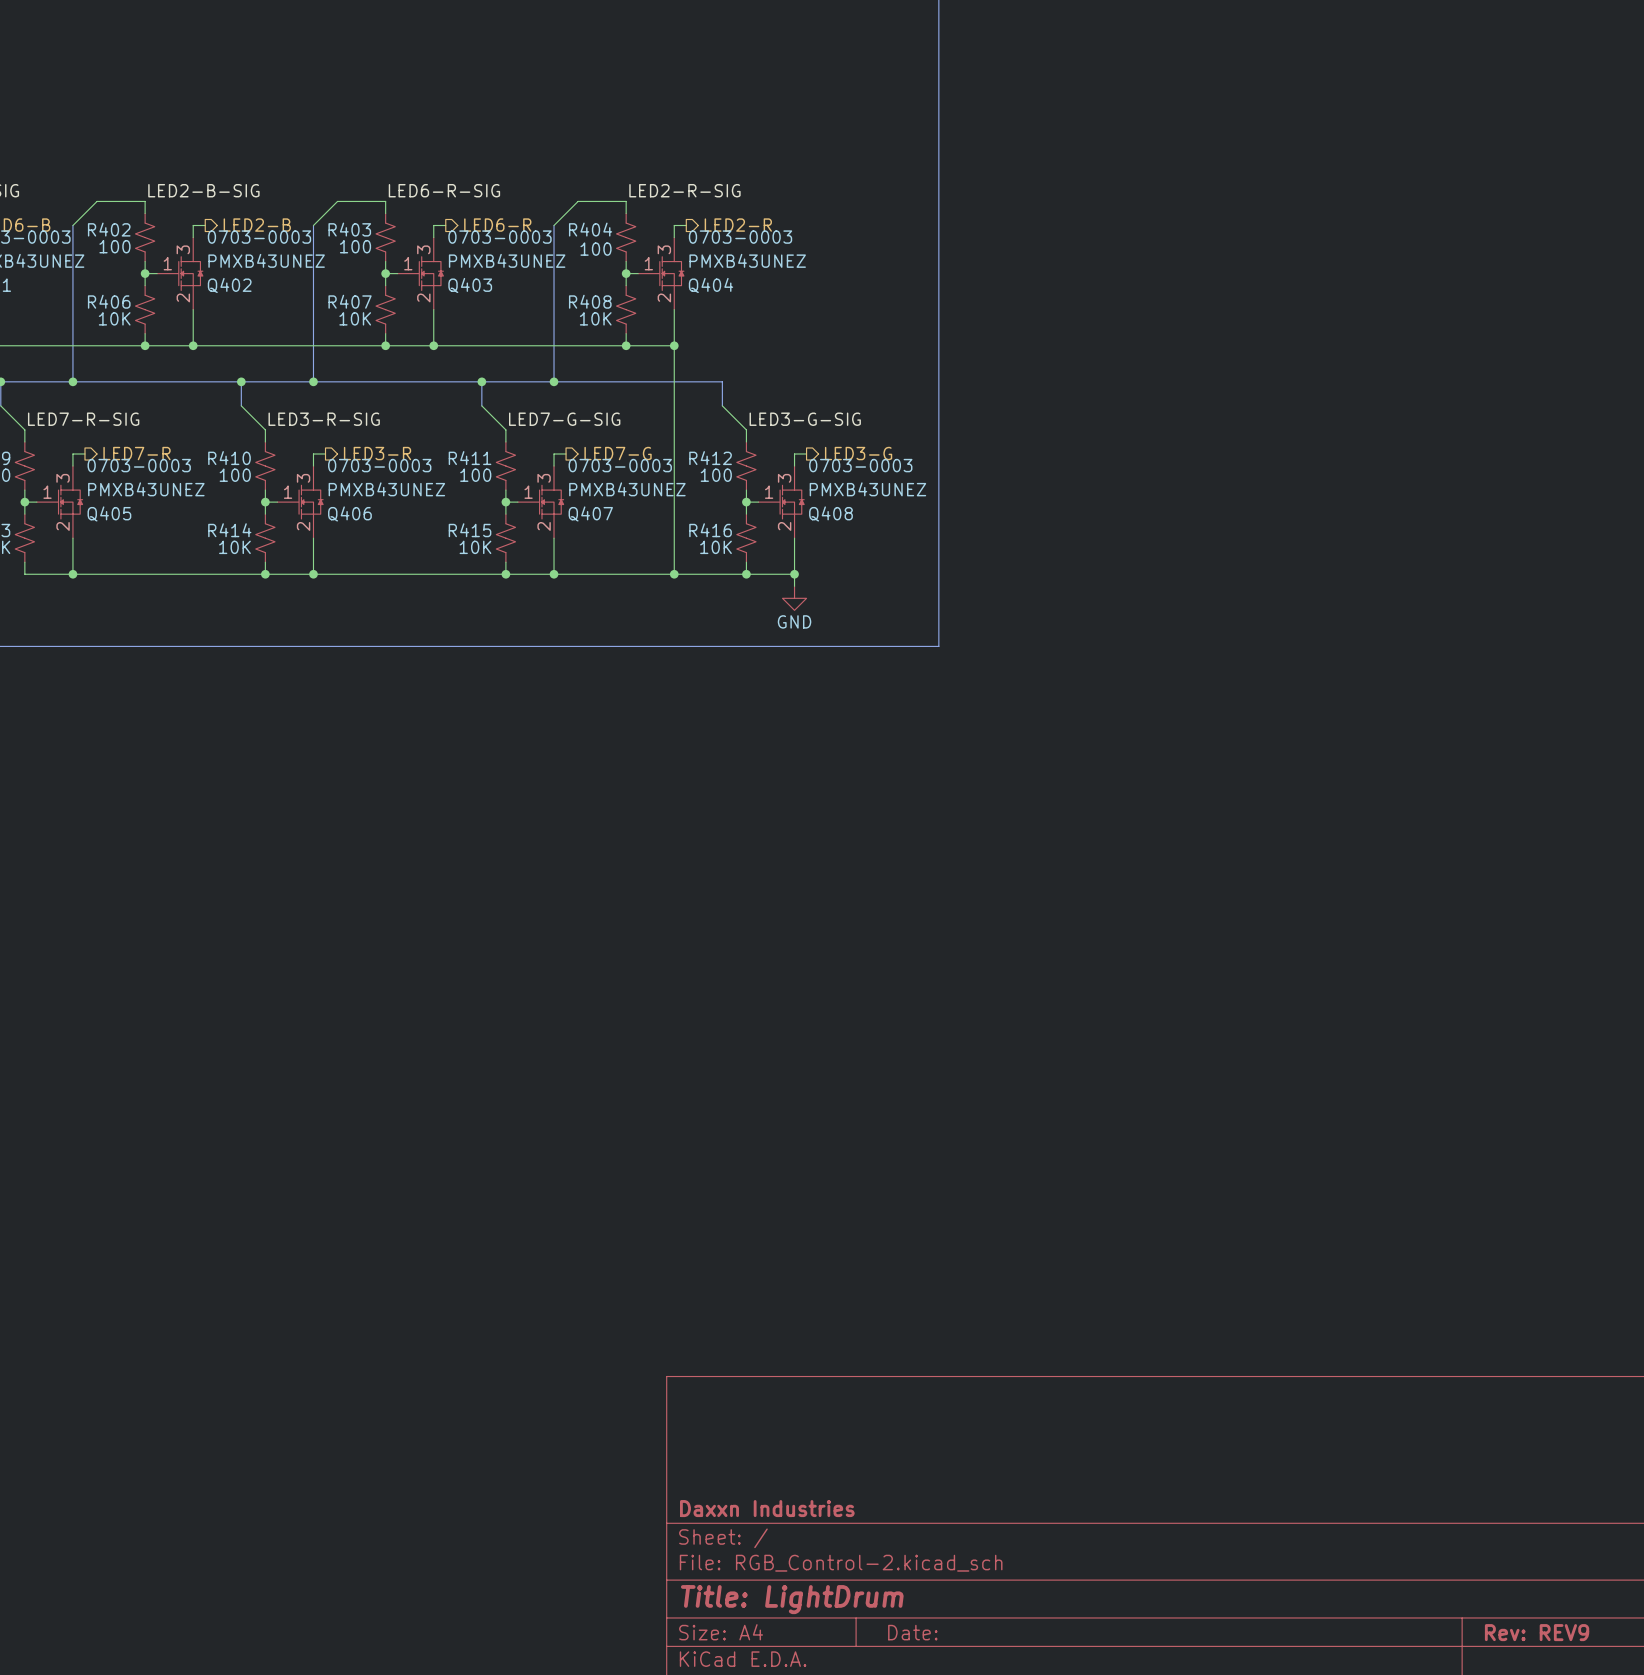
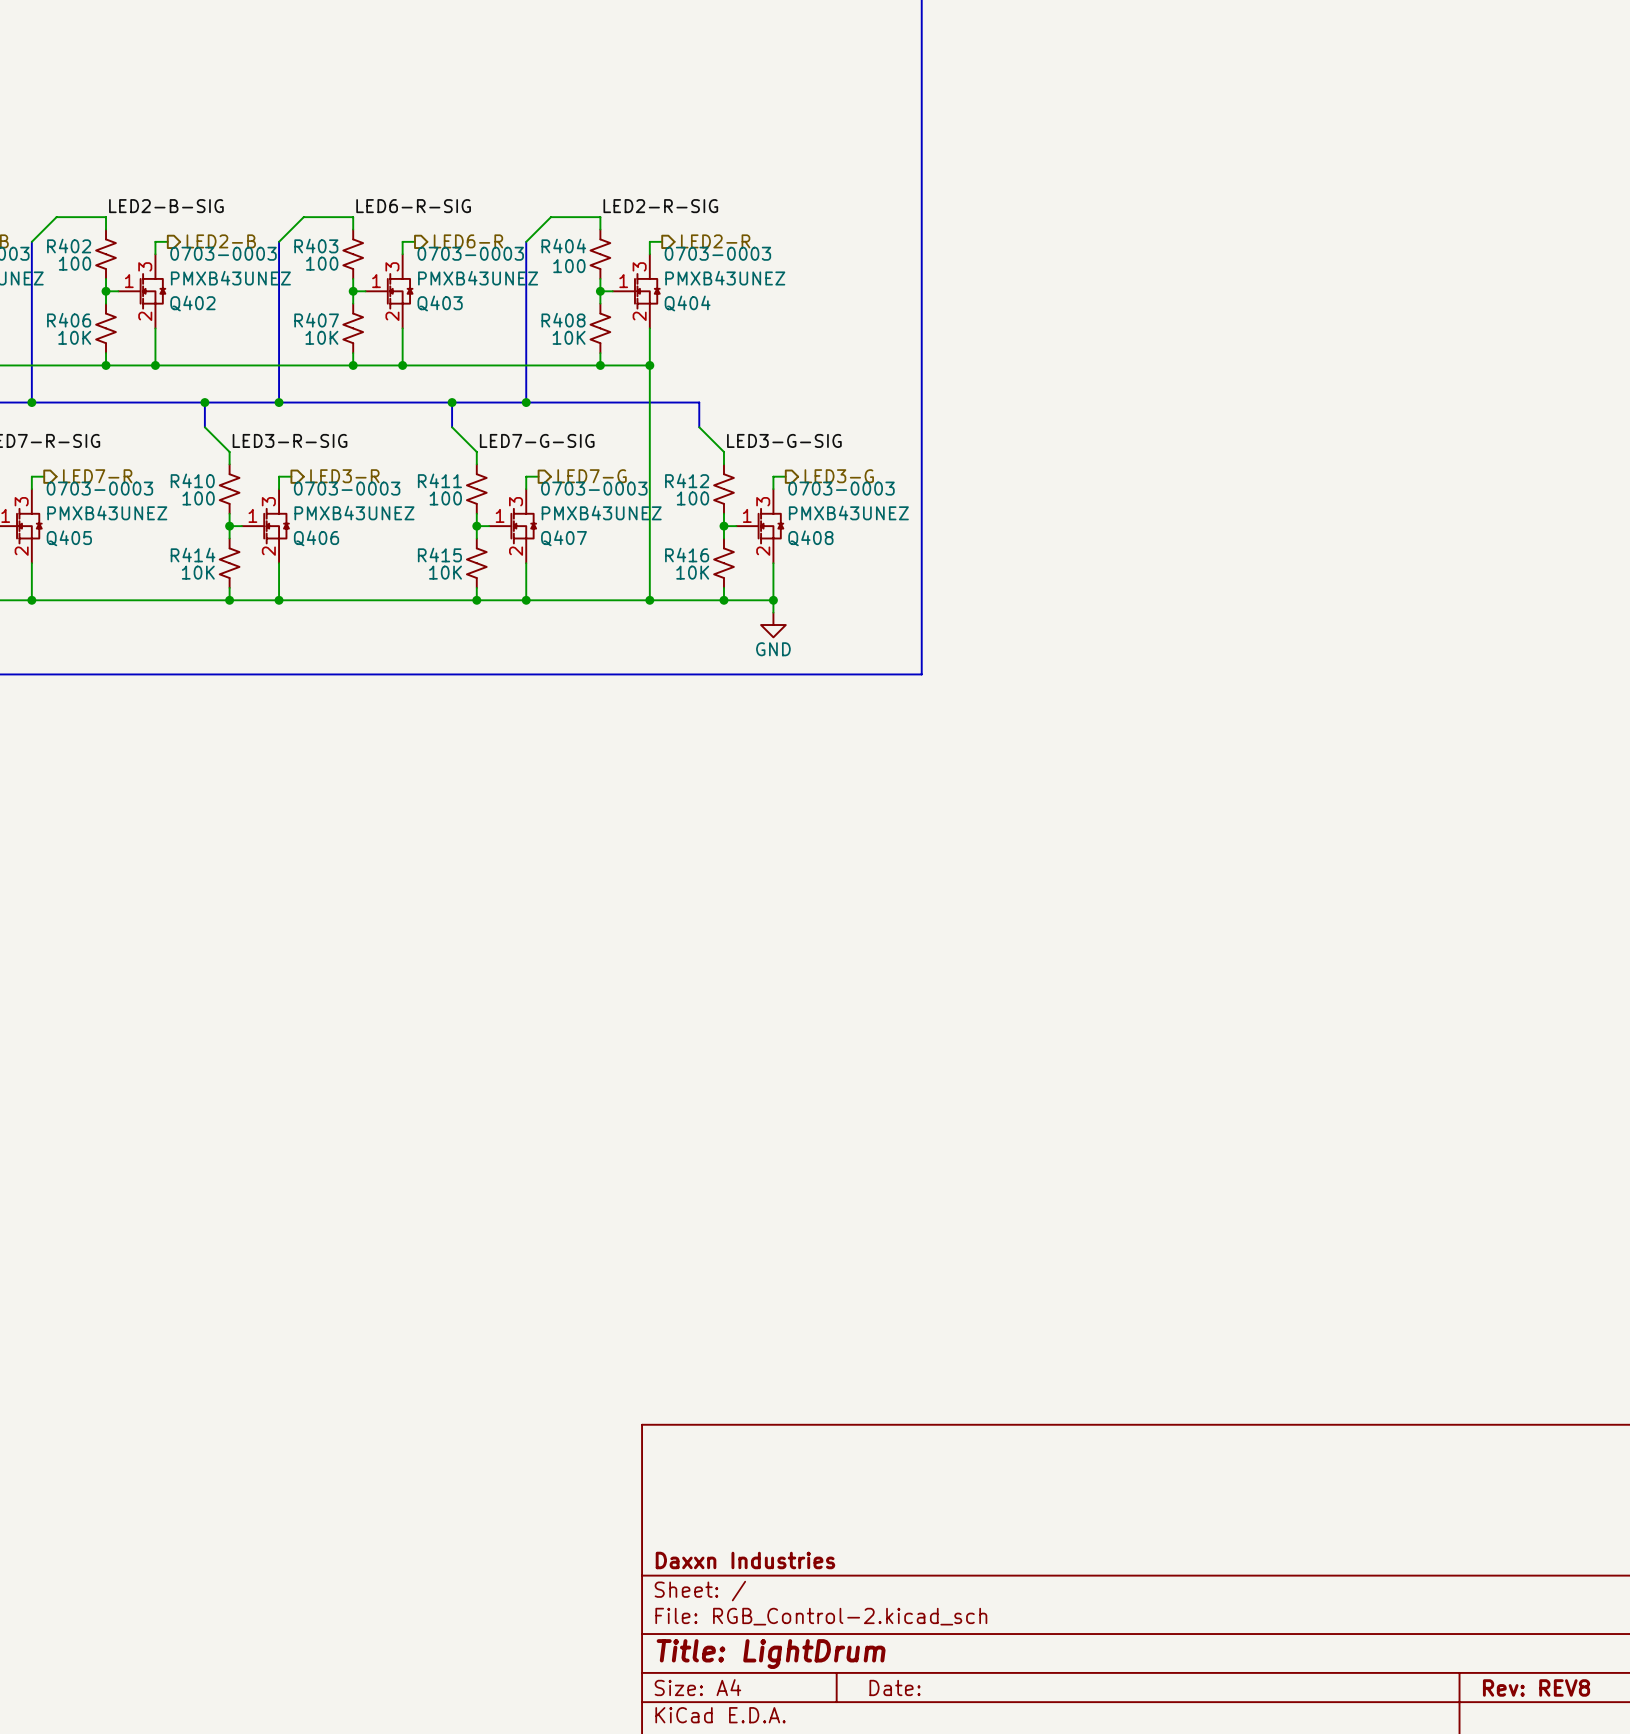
title block: Rev: REV9 (1537, 1632) -> Rev: REV8 (1536, 1687)

